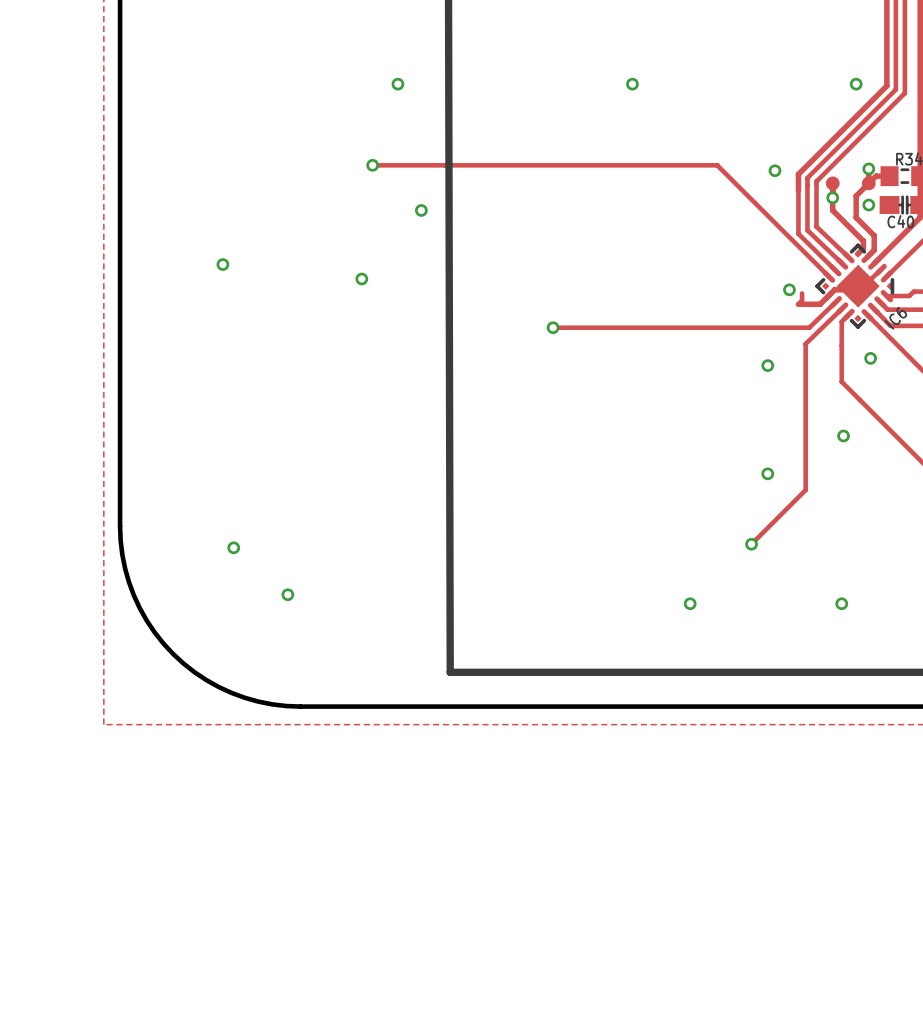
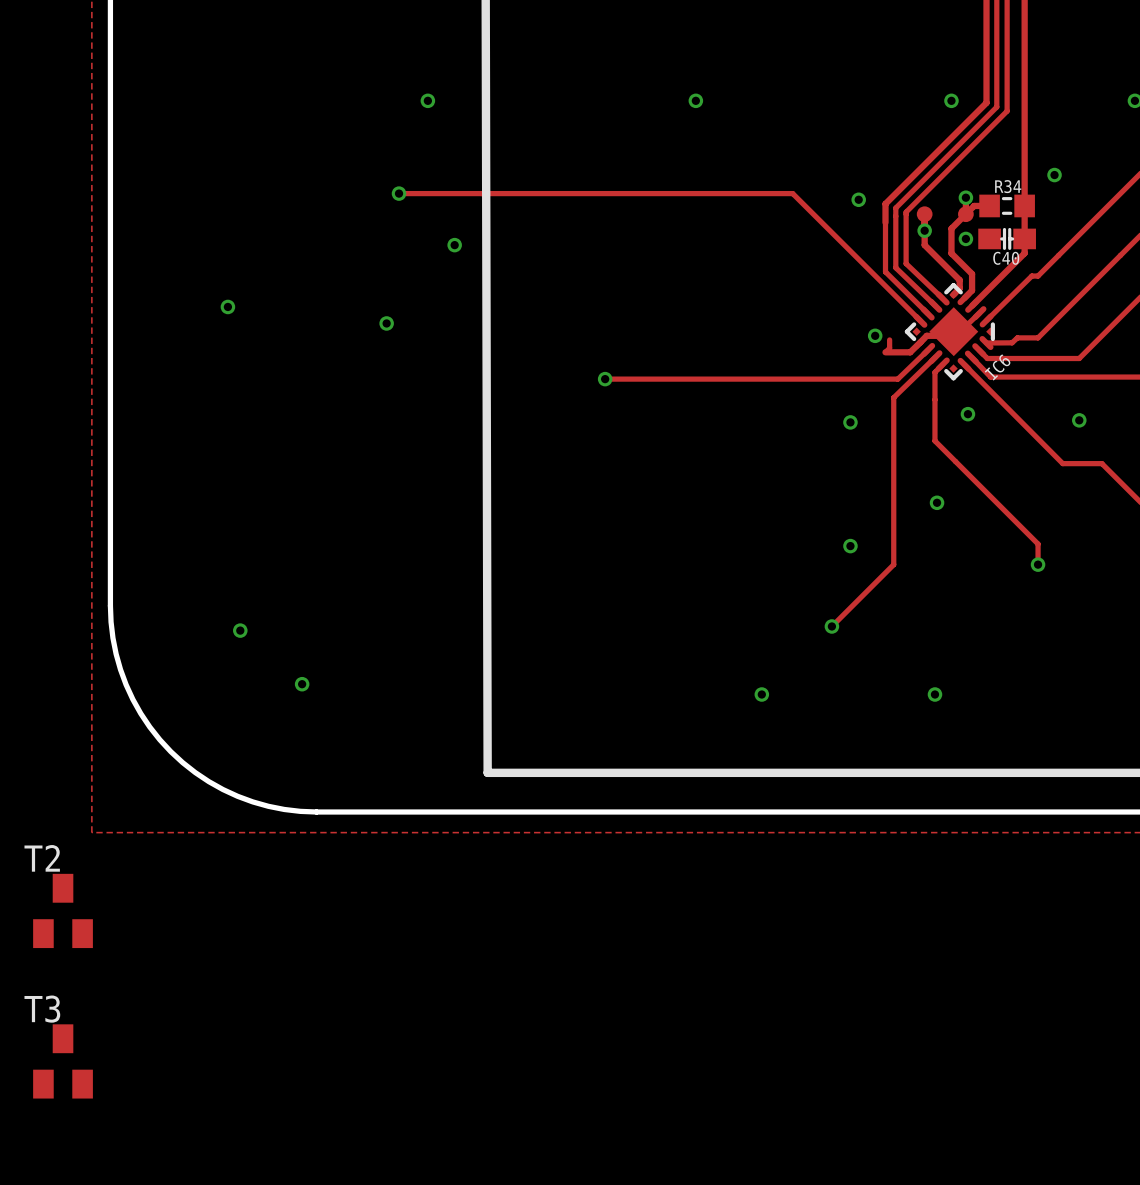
T2: none -> (63, 910)
T3: none -> (63, 1061)

